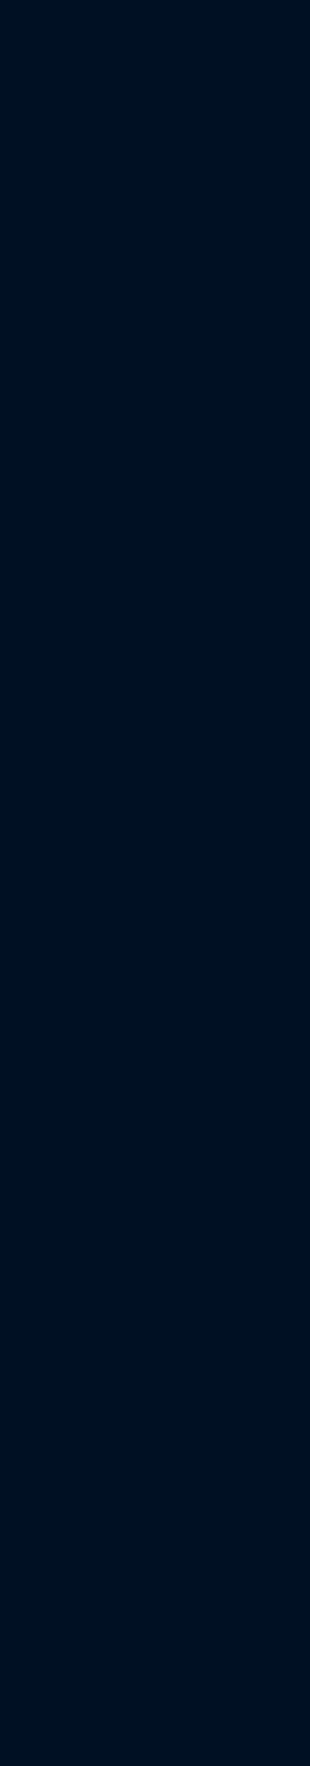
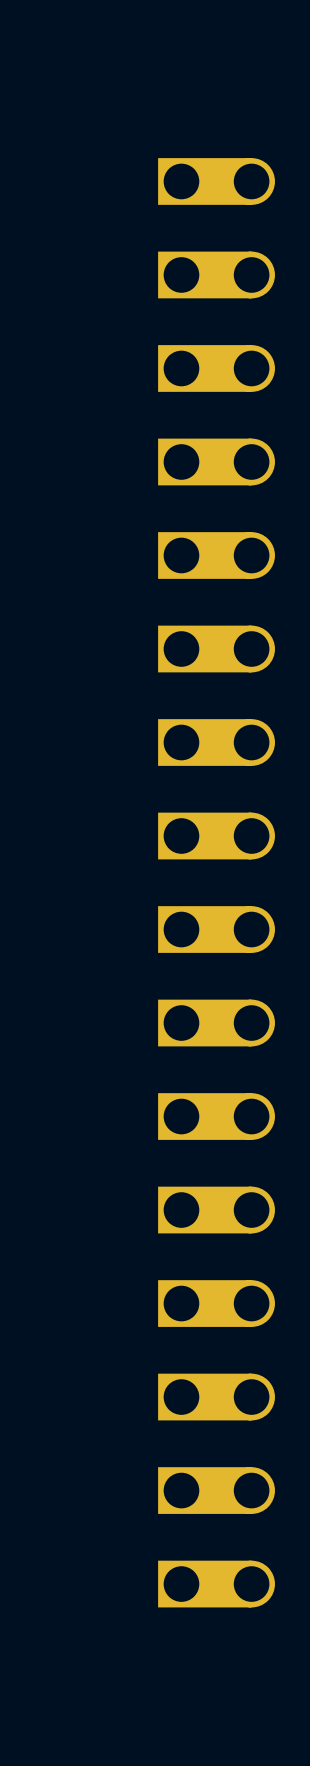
part: none -> (216, 882)

